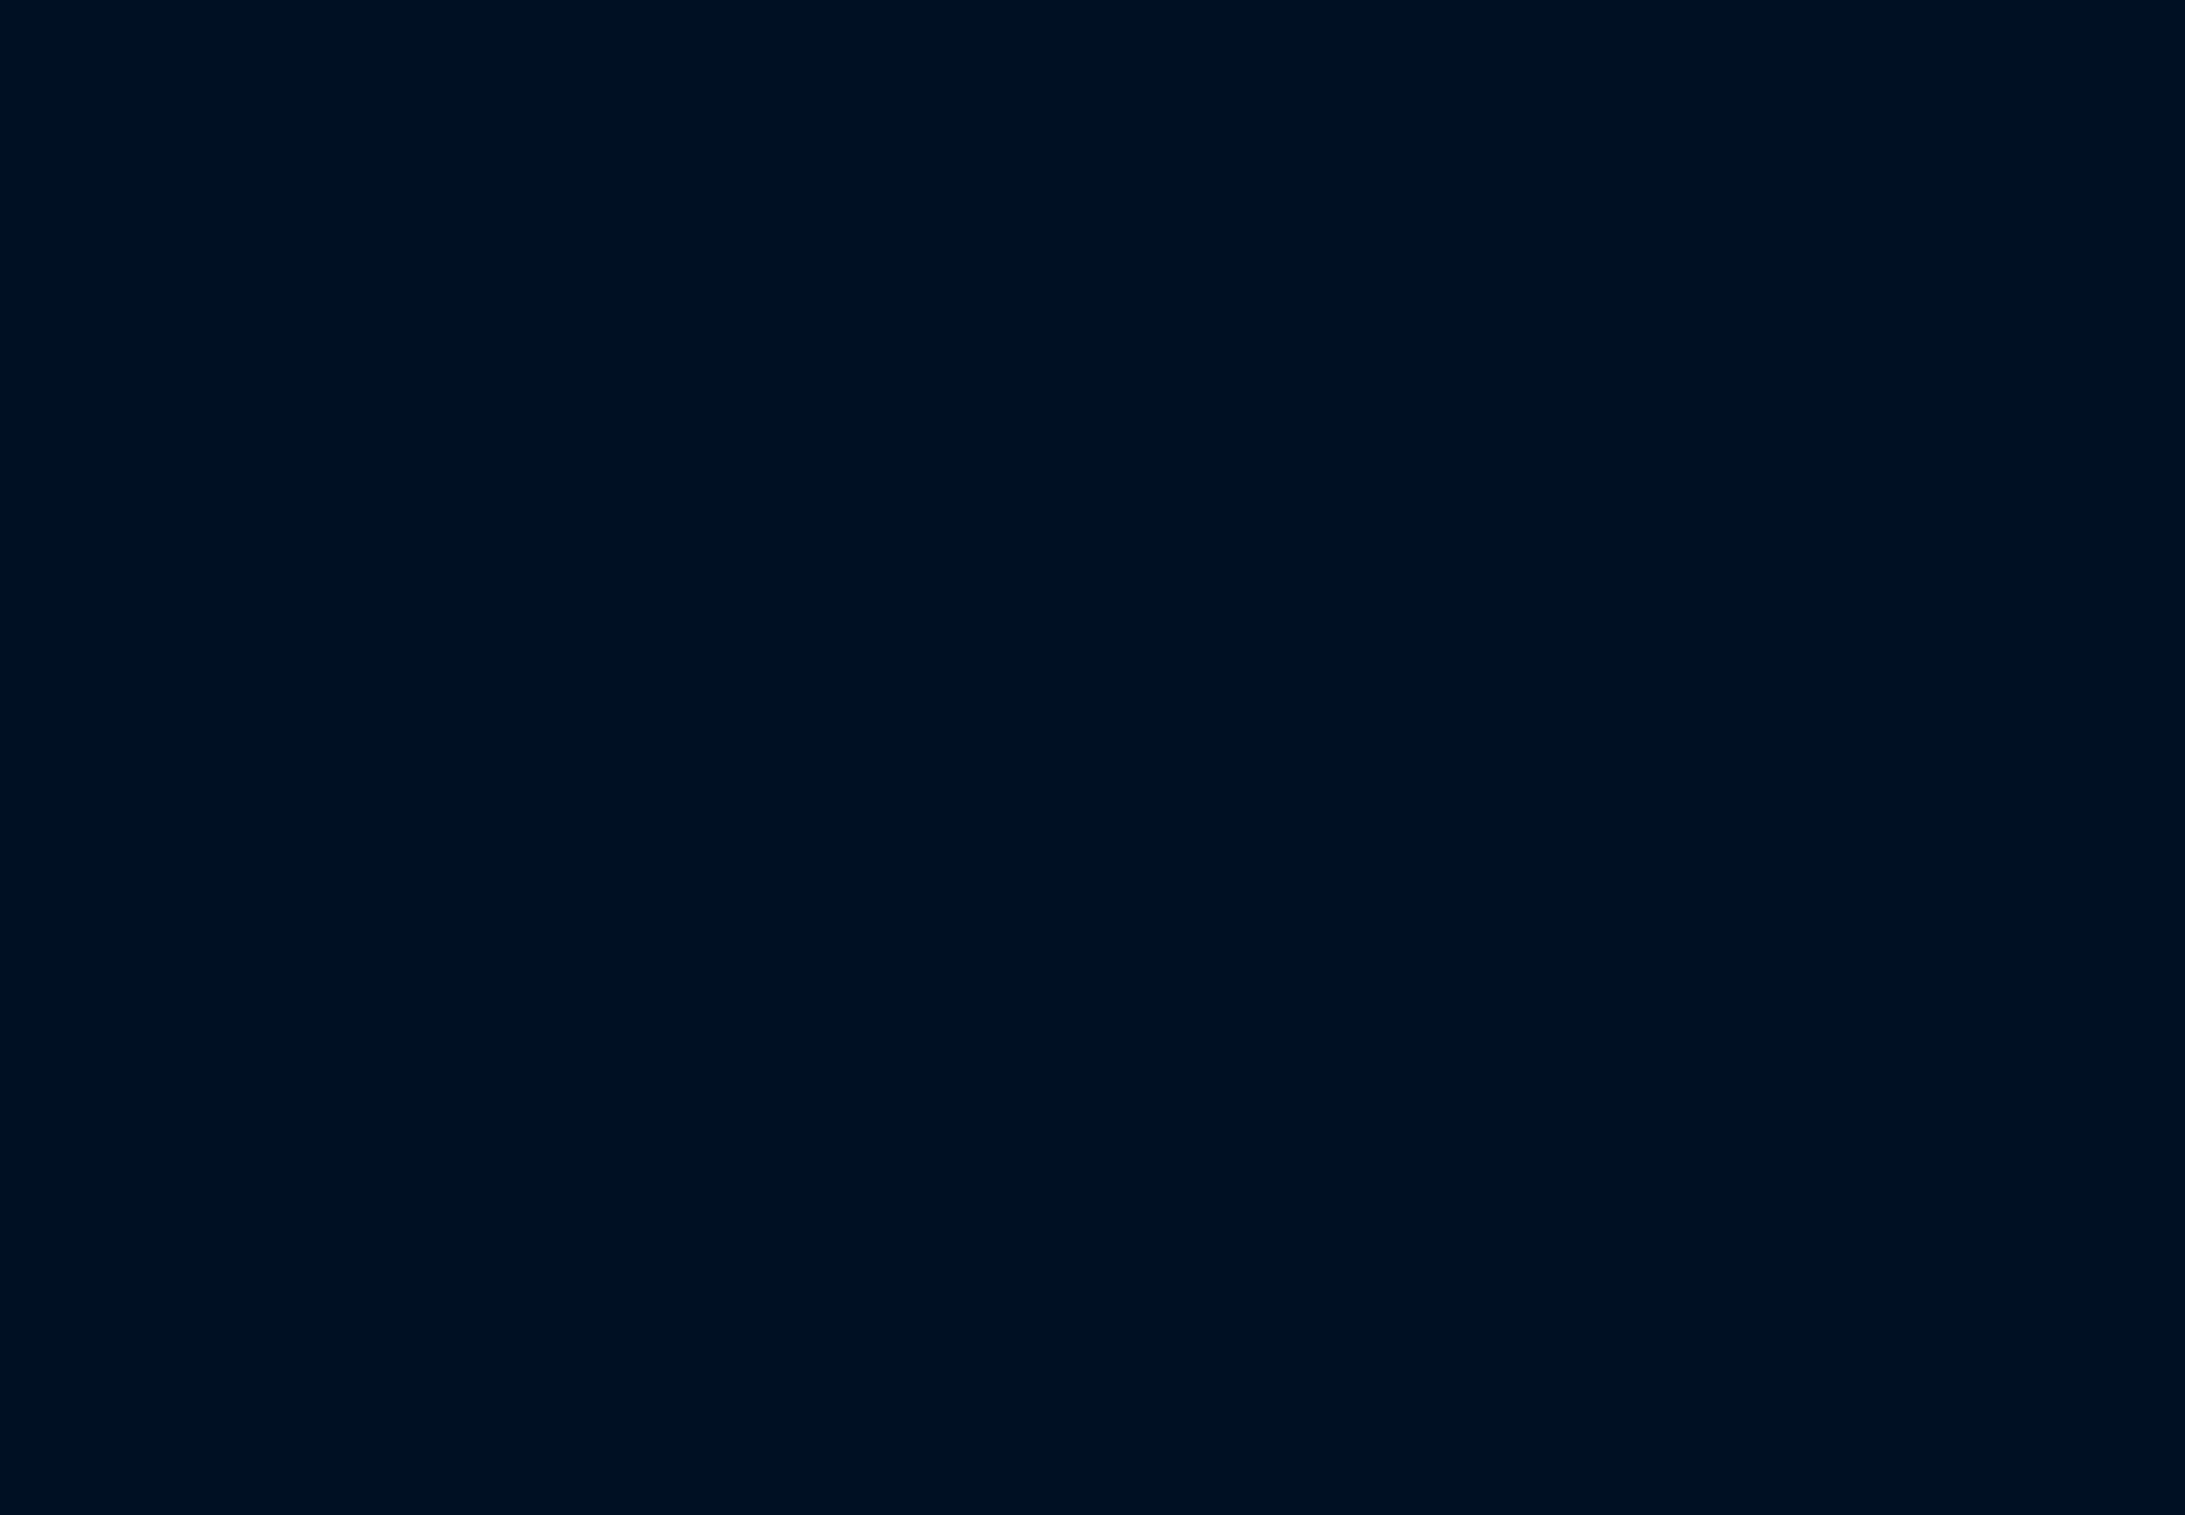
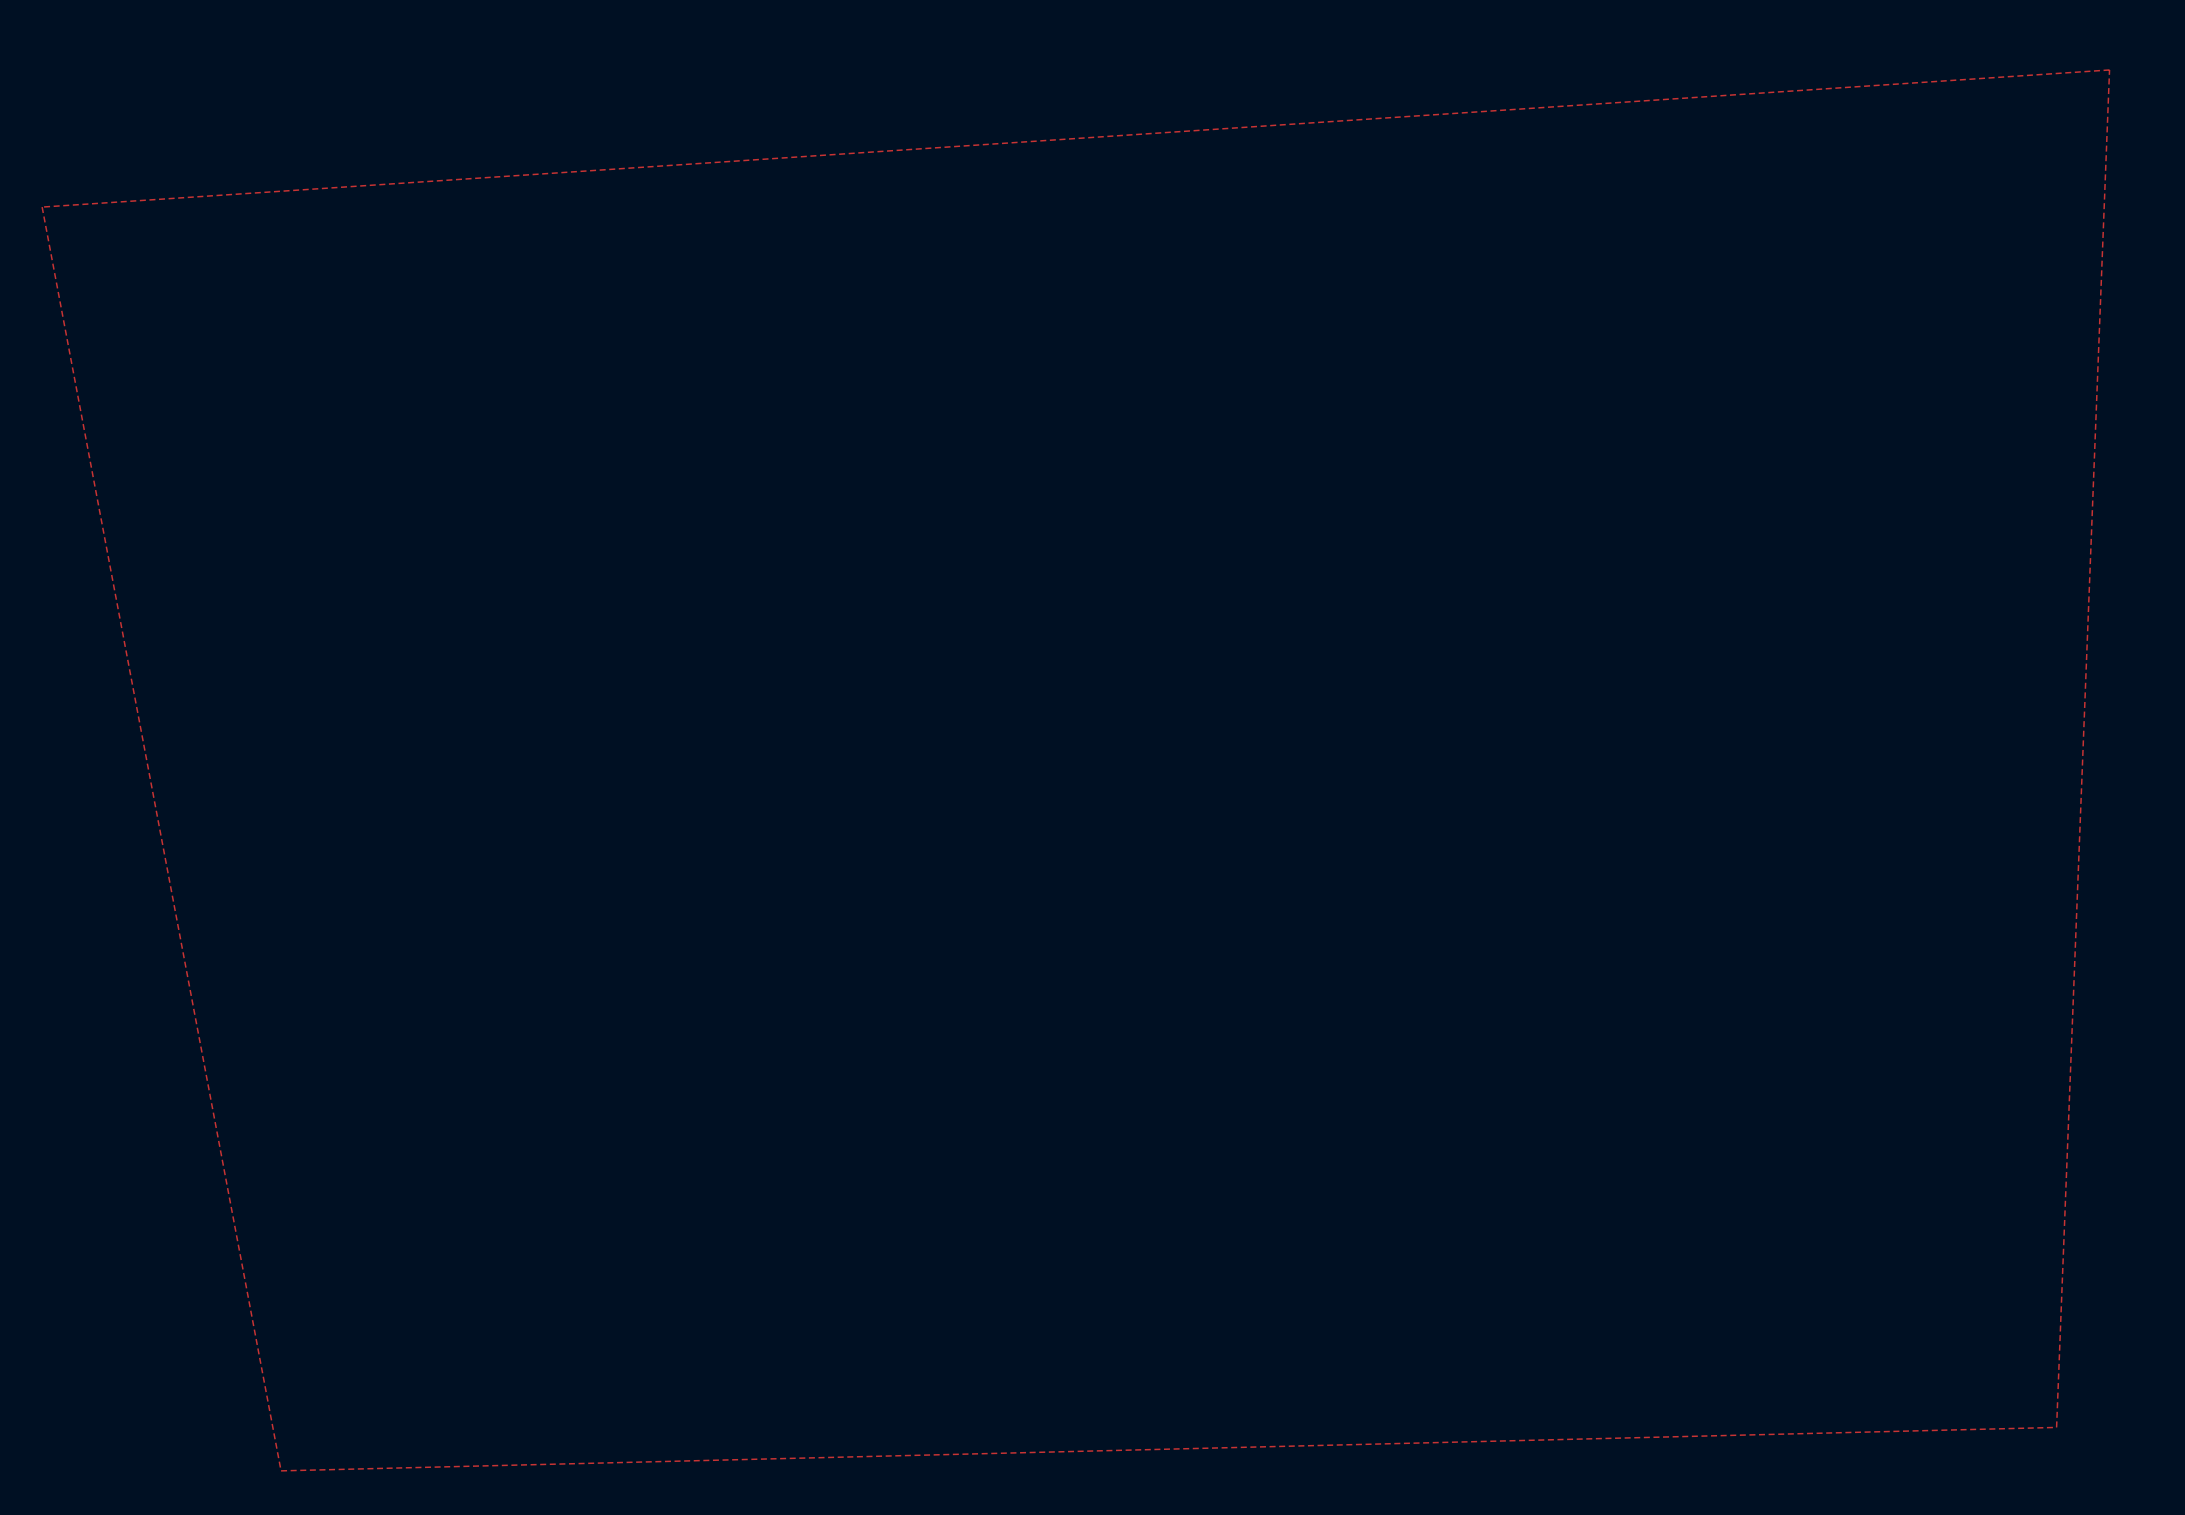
zone outline: none -> (2109, 69) (42, 207) (281, 1470) (2056, 1427) (2109, 69)

